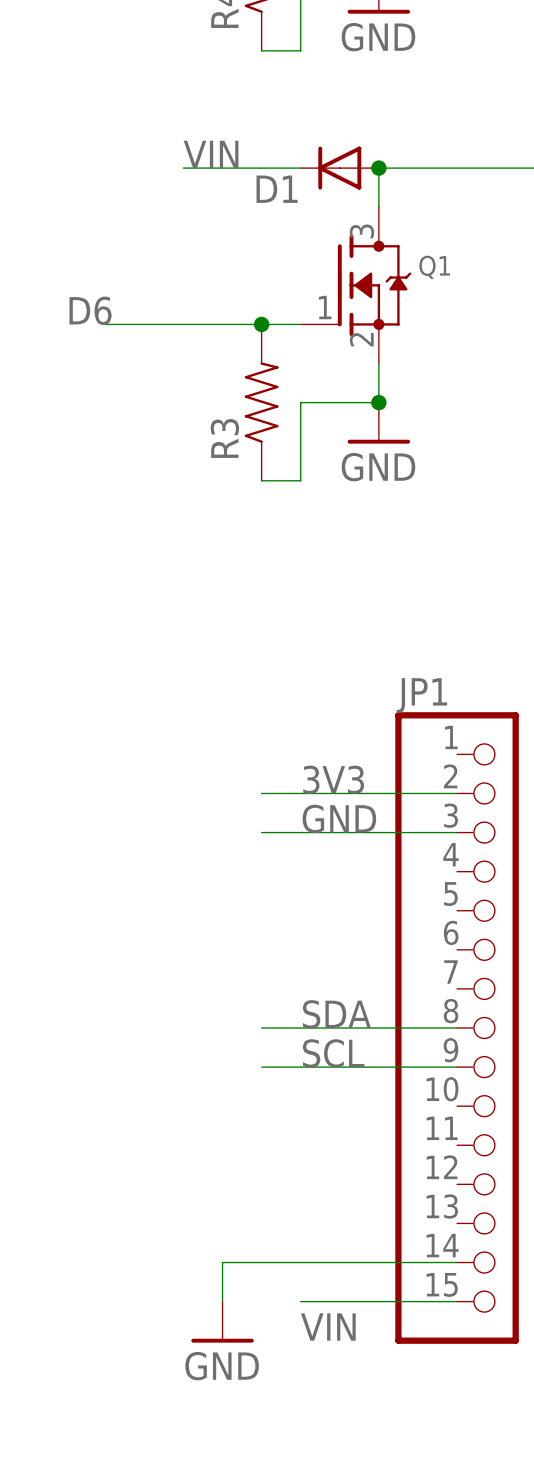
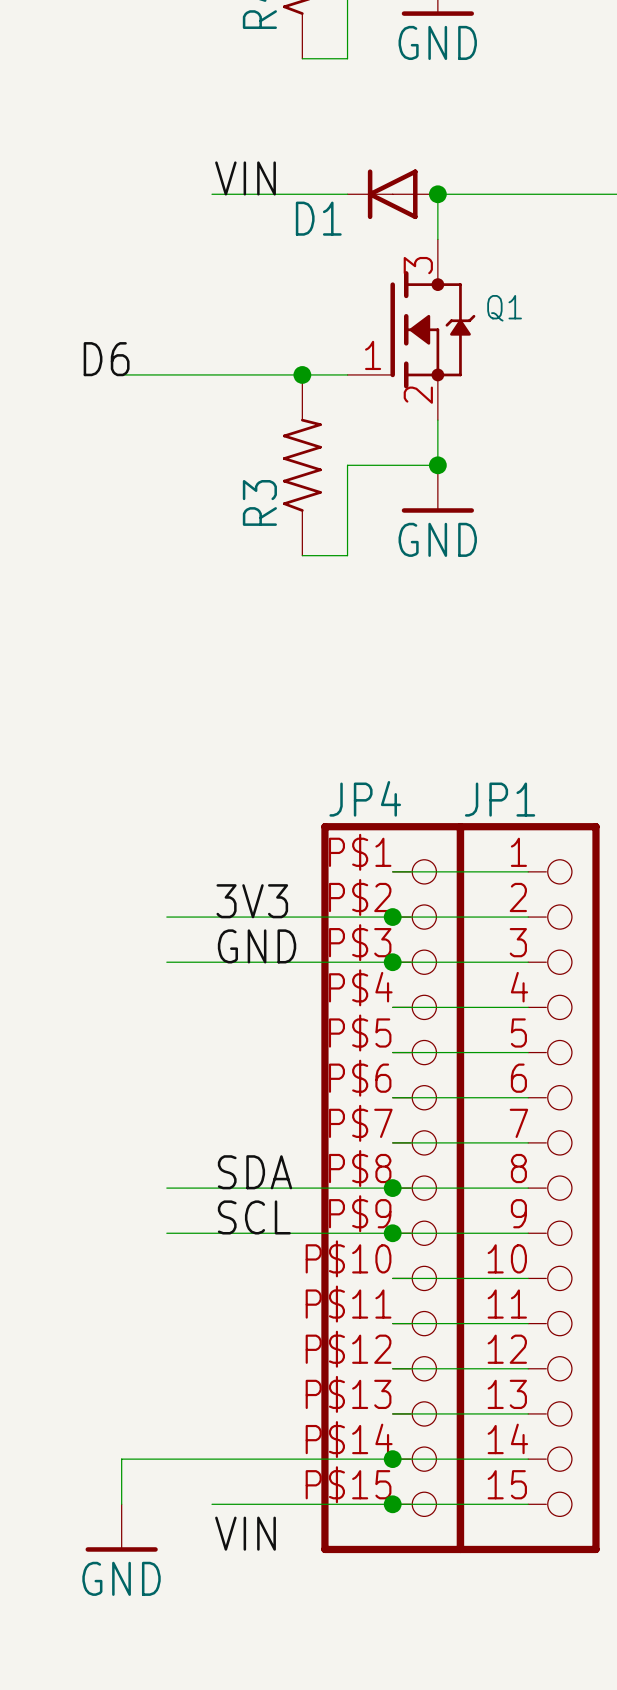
wire: none -> (392, 871) (528, 871)
label position: 3V3 (333, 779) -> 3V3 (252, 901)
wire: none -> (166, 917) (302, 917)
junction: none -> (392, 917)
label position: GND (339, 818) -> GND (257, 946)
wire: none -> (166, 962) (302, 962)
junction: none -> (392, 962)
wire: none -> (392, 1007) (528, 1007)
wire: none -> (392, 1052) (528, 1052)
wire: none -> (392, 1097) (528, 1097)
wire: none -> (392, 1142) (528, 1142)
label position: SDA (336, 1014) -> SDA (255, 1172)
wire: none -> (166, 1188) (302, 1188)
JP4: none -> (392, 1188)
junction: none -> (392, 1188)
label position: SCL (333, 1053) -> SCL (254, 1217)
wire: none -> (166, 1233) (302, 1233)
junction: none -> (392, 1233)
wire: none -> (392, 1278) (528, 1278)
wire: none -> (392, 1323) (528, 1323)
wire: none -> (392, 1368) (528, 1368)
wire: none -> (392, 1413) (528, 1413)
wire: (222, 1262) (222, 1301) -> (257, 1459) (121, 1459) (121, 1504)
junction: none -> (392, 1459)
wire: none -> (212, 1504) (347, 1504)
junction: none -> (392, 1504)
power symbol position: GND (222, 1322) -> GND (121, 1528)
label position: VIN (328, 1327) -> VIN (245, 1533)

